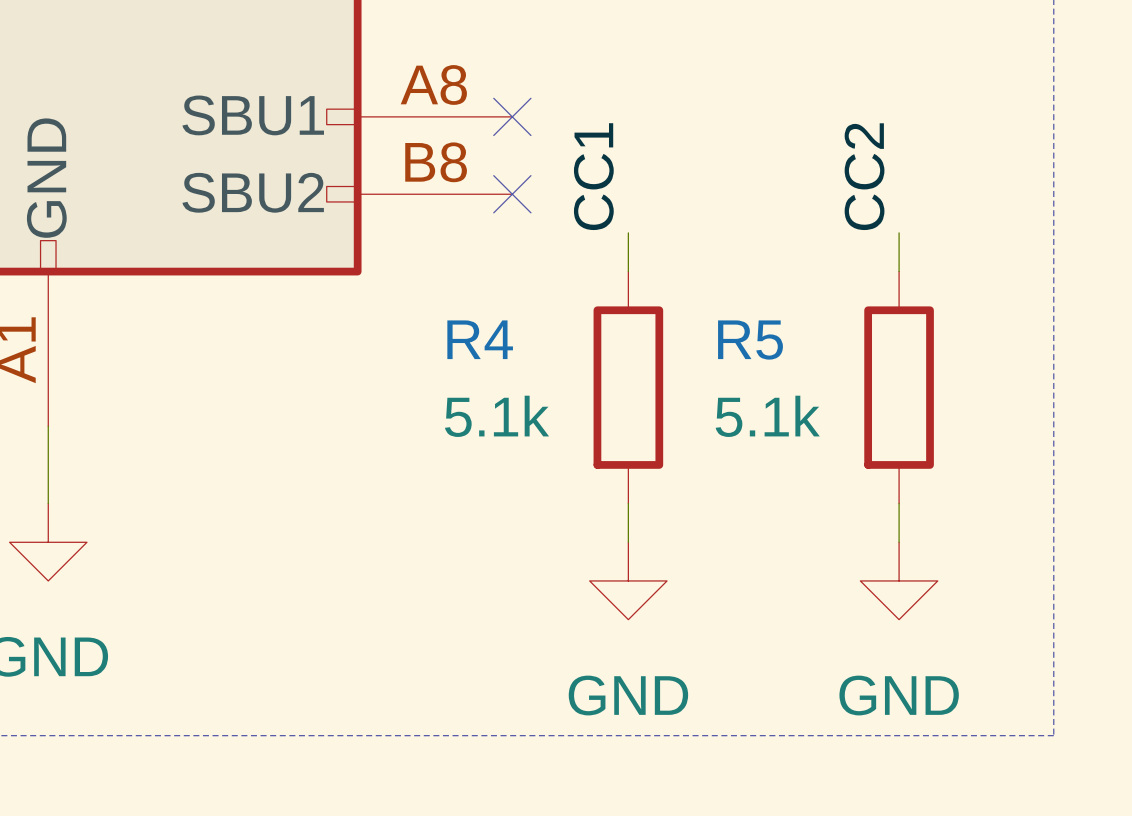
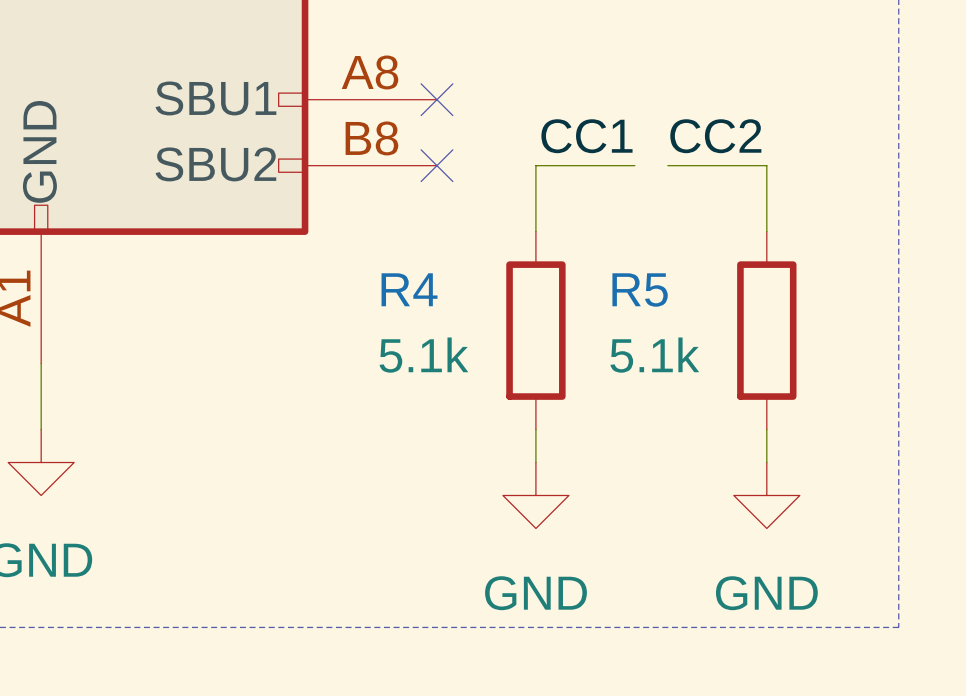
label rotation: 0° (593, 176) -> 90° clockwise (586, 136)
label rotation: 0° (864, 176) -> 90° clockwise (715, 136)
wire: none -> (634, 165) (535, 165) (535, 198)
wire: none -> (667, 165) (766, 165) (766, 198)

